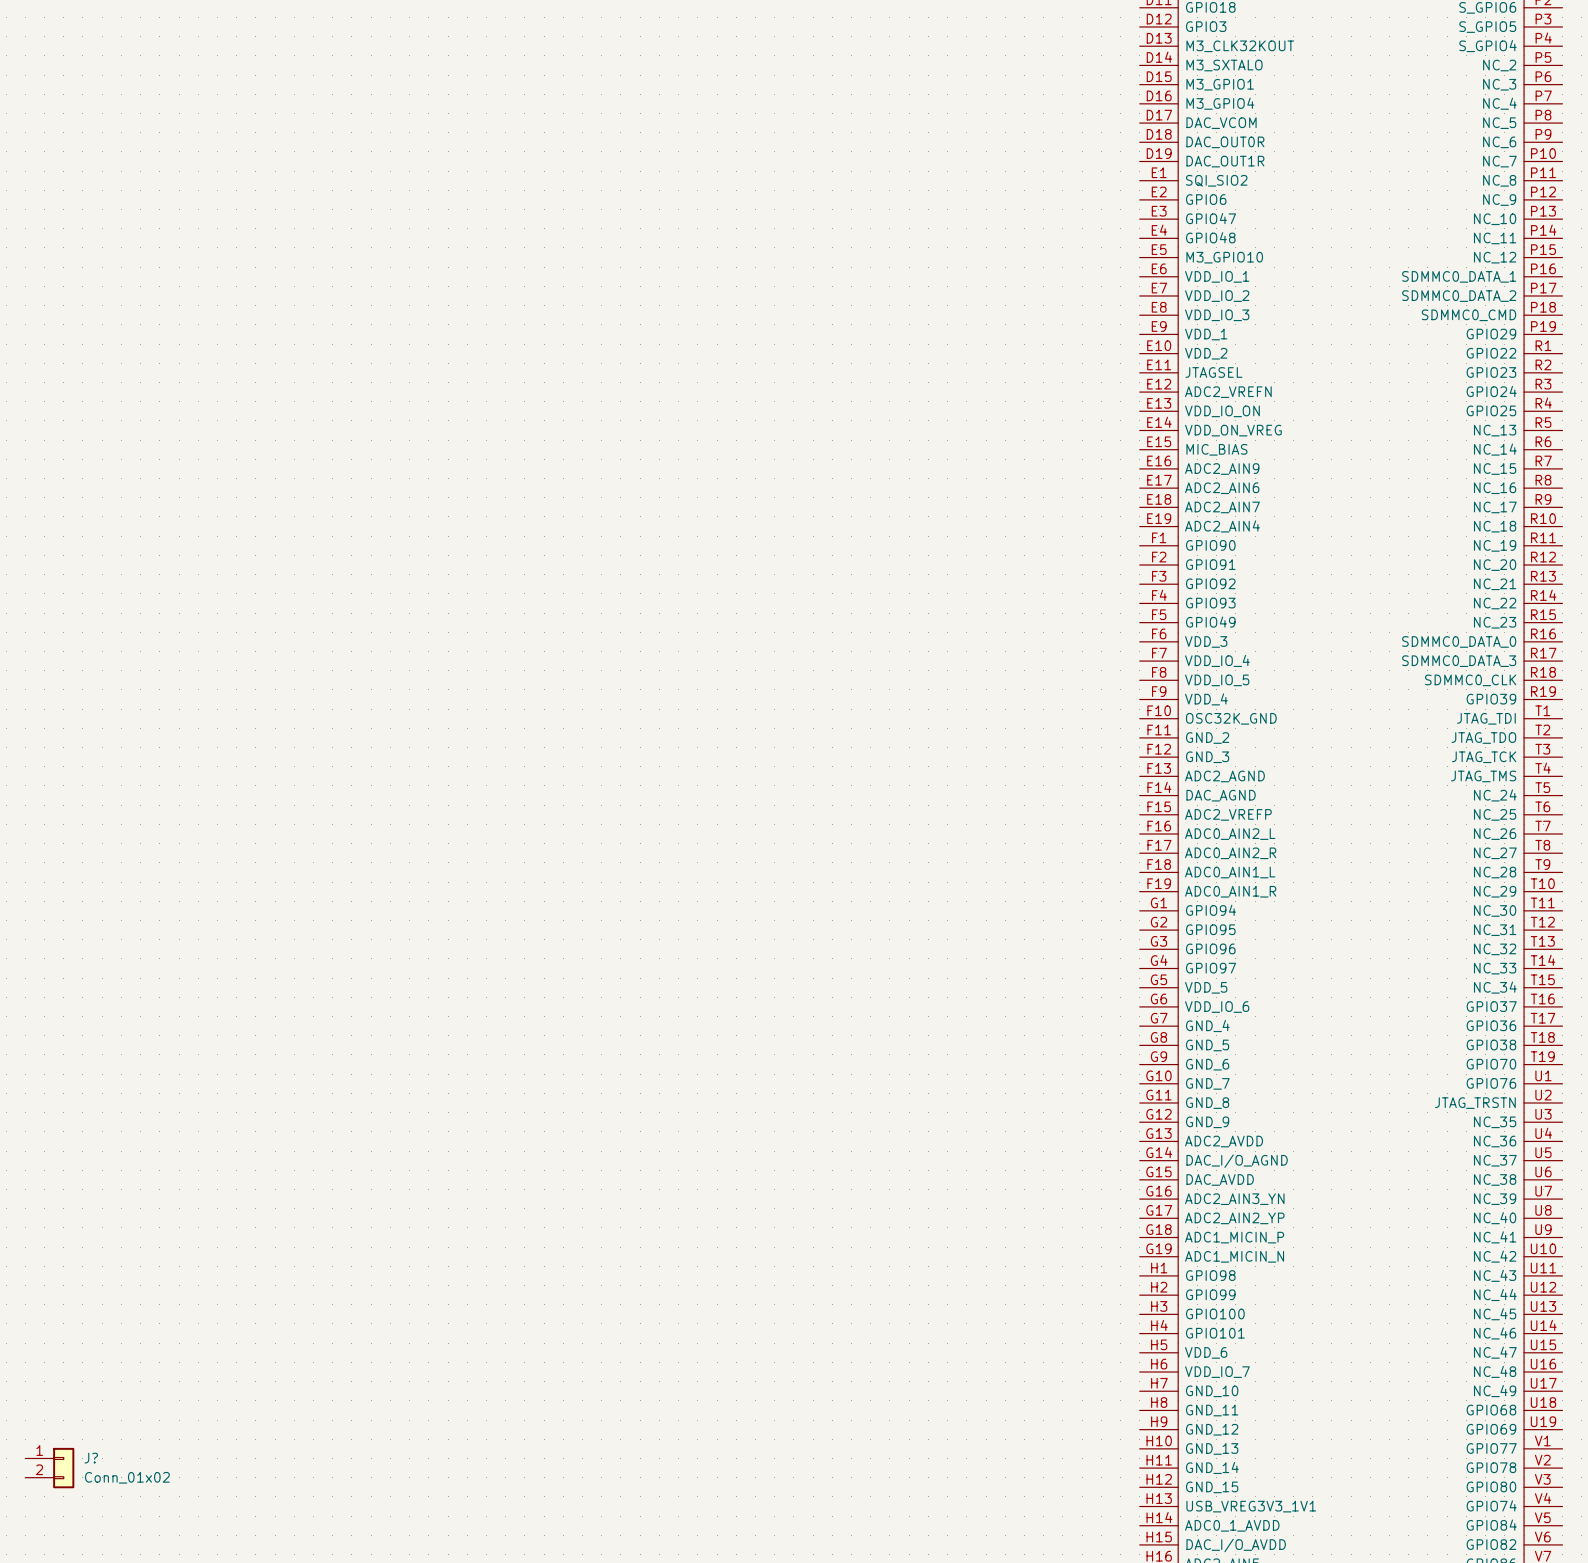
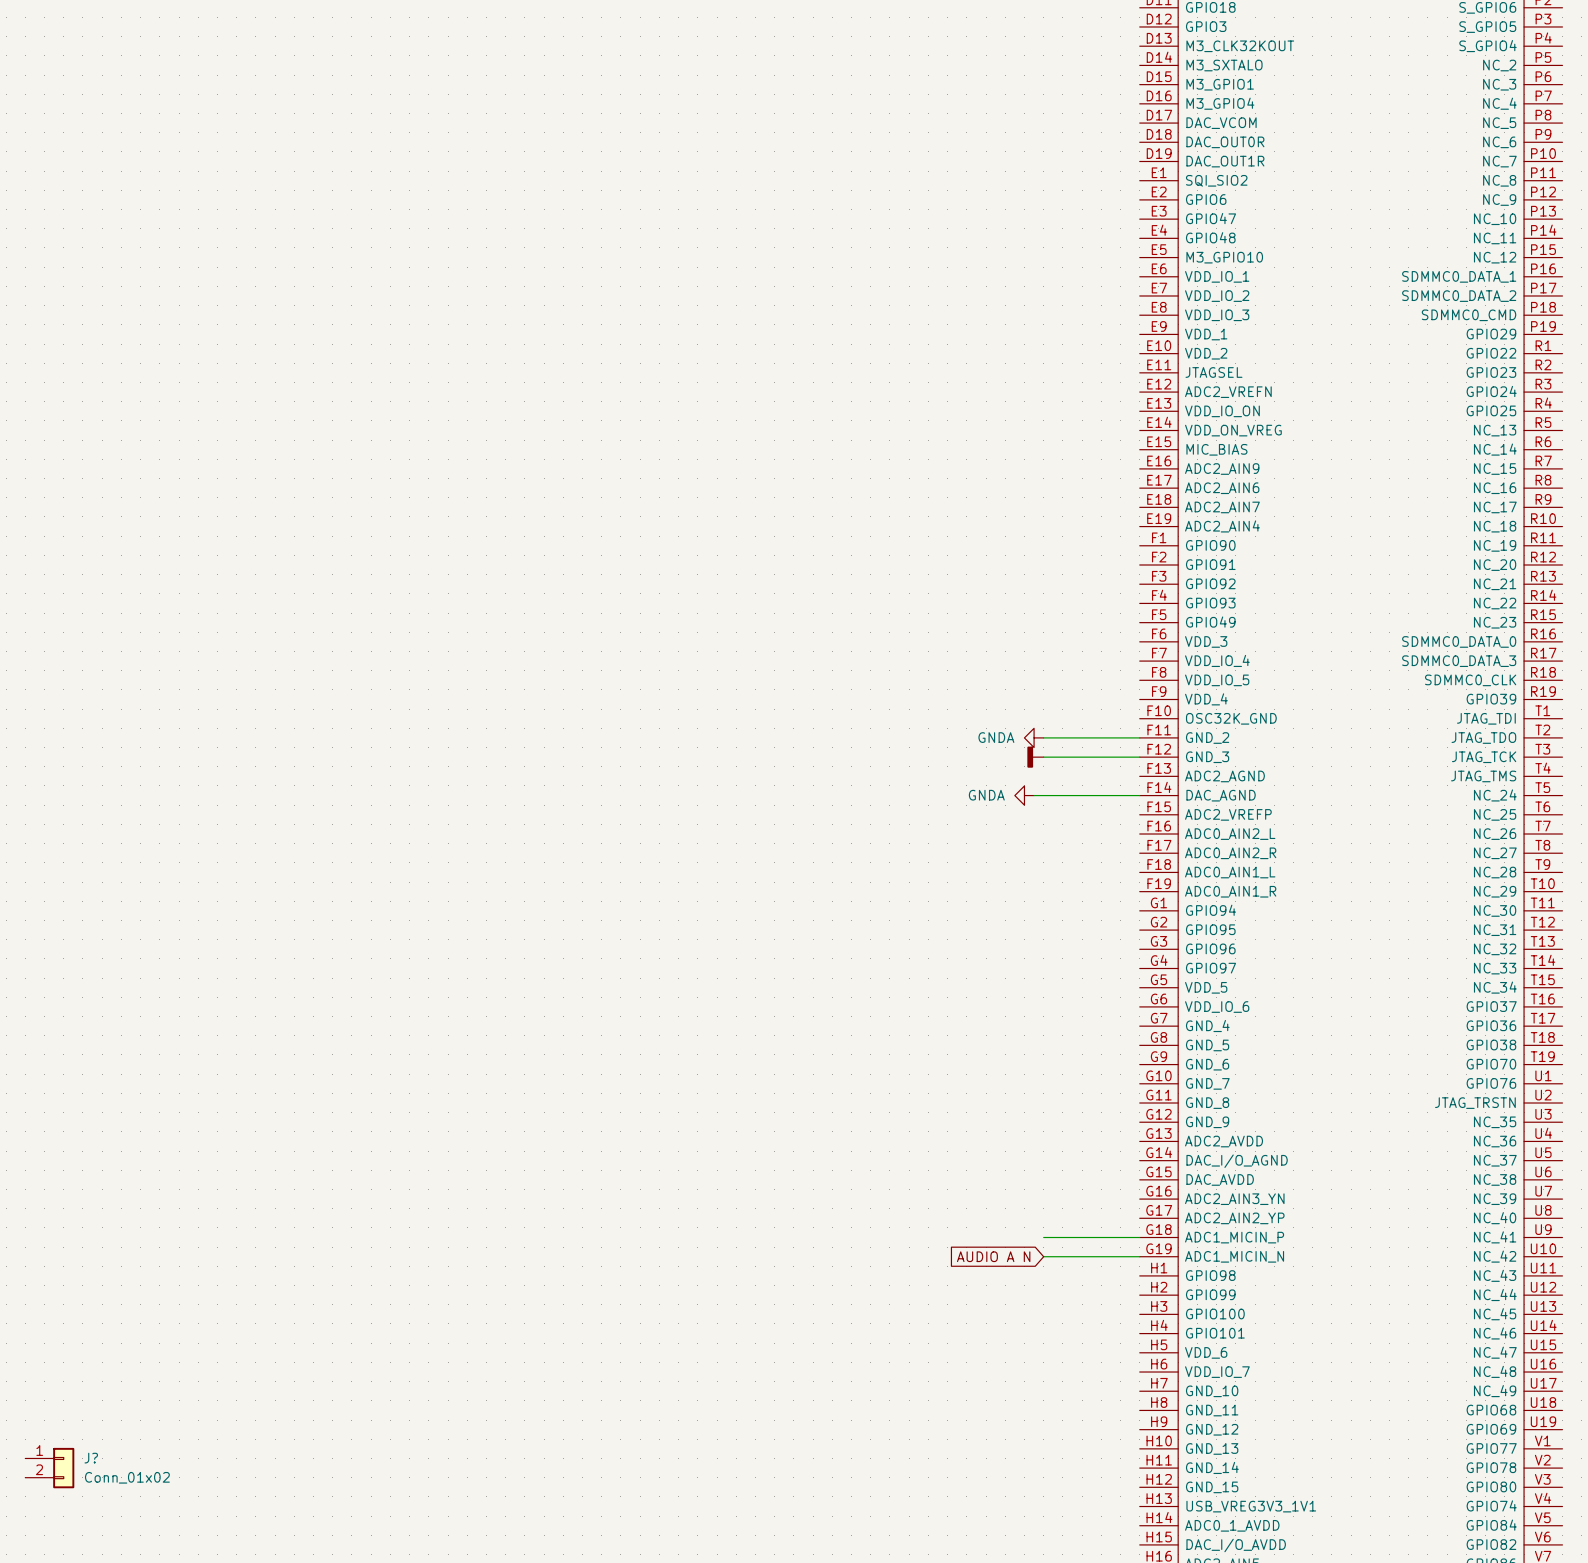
power symbol: none -> GNDA (1034, 737)
wire: none -> (1043, 737) (1139, 737)
power symbol: none -> (1035, 757)
wire: none -> (1043, 757) (1139, 757)
power symbol: none -> GNDA (1024, 795)
wire: none -> (1034, 795) (1139, 795)
wire: none -> (1043, 1237) (1139, 1237)
global label: none -> AUDIO A N (993, 1256)
wire: none -> (1043, 1256) (1139, 1256)

